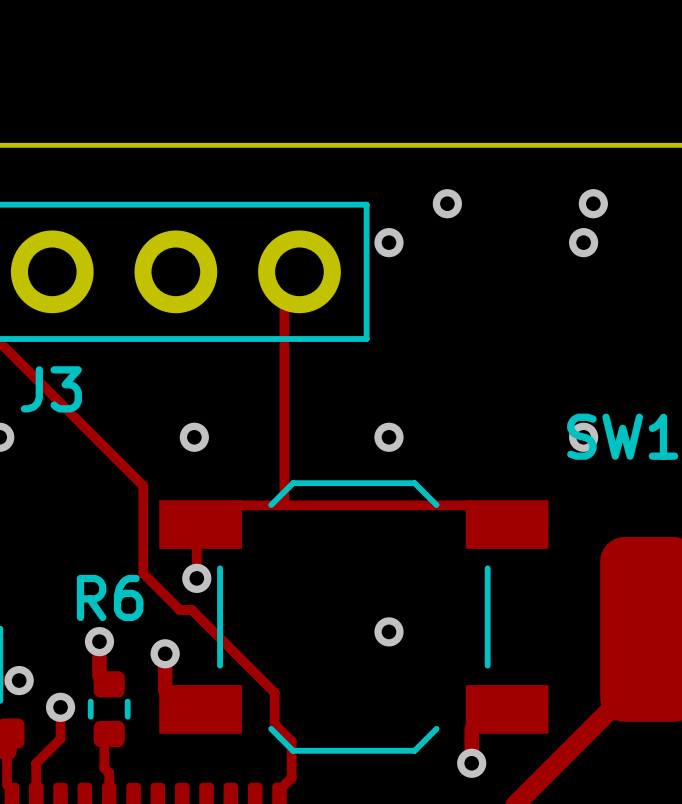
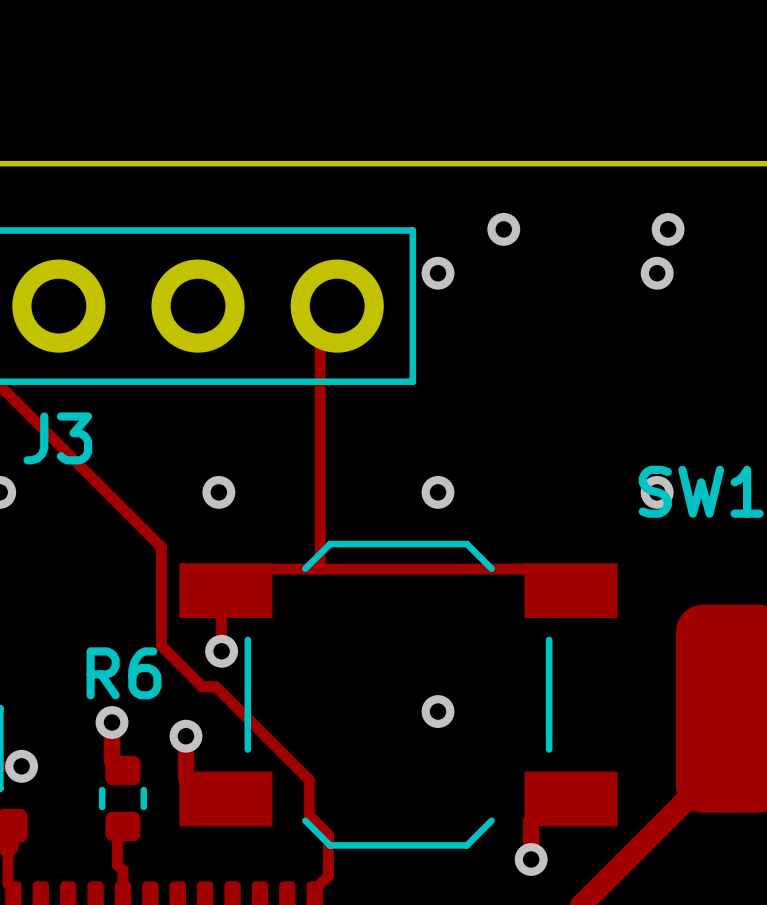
track: (60, 707) (60, 738) (36, 763) (36, 785) -> none
via: (60, 707) -> none

